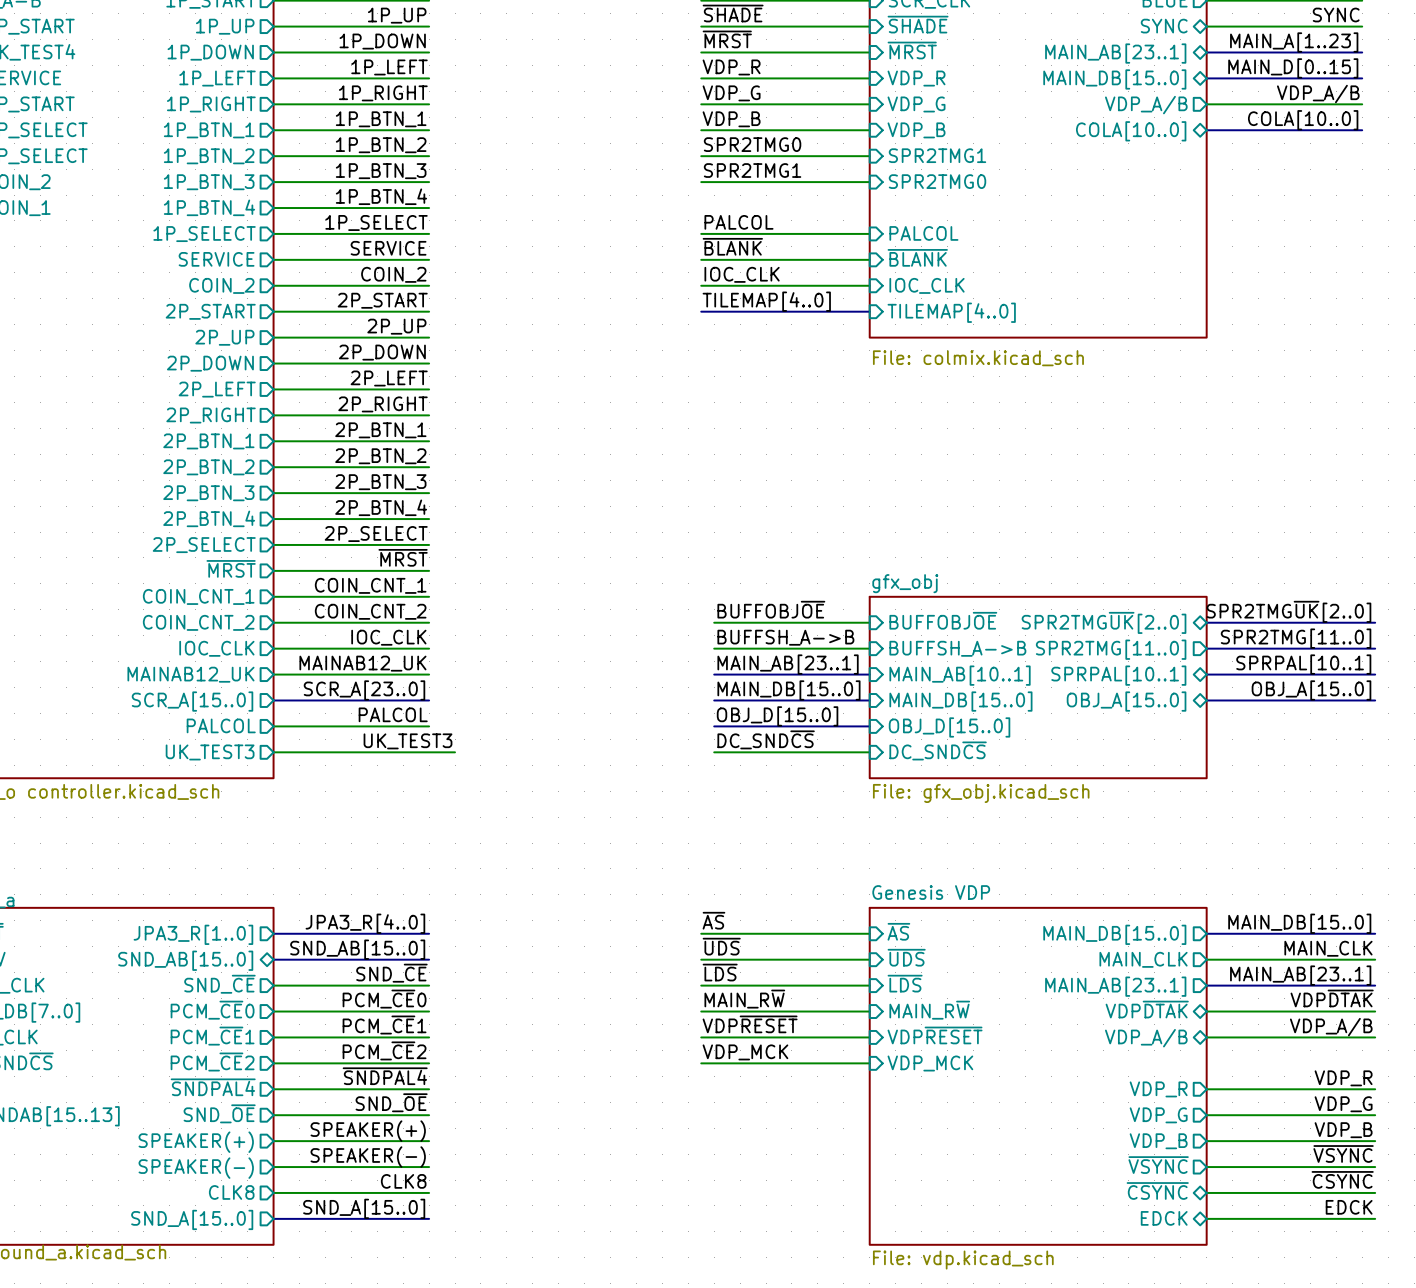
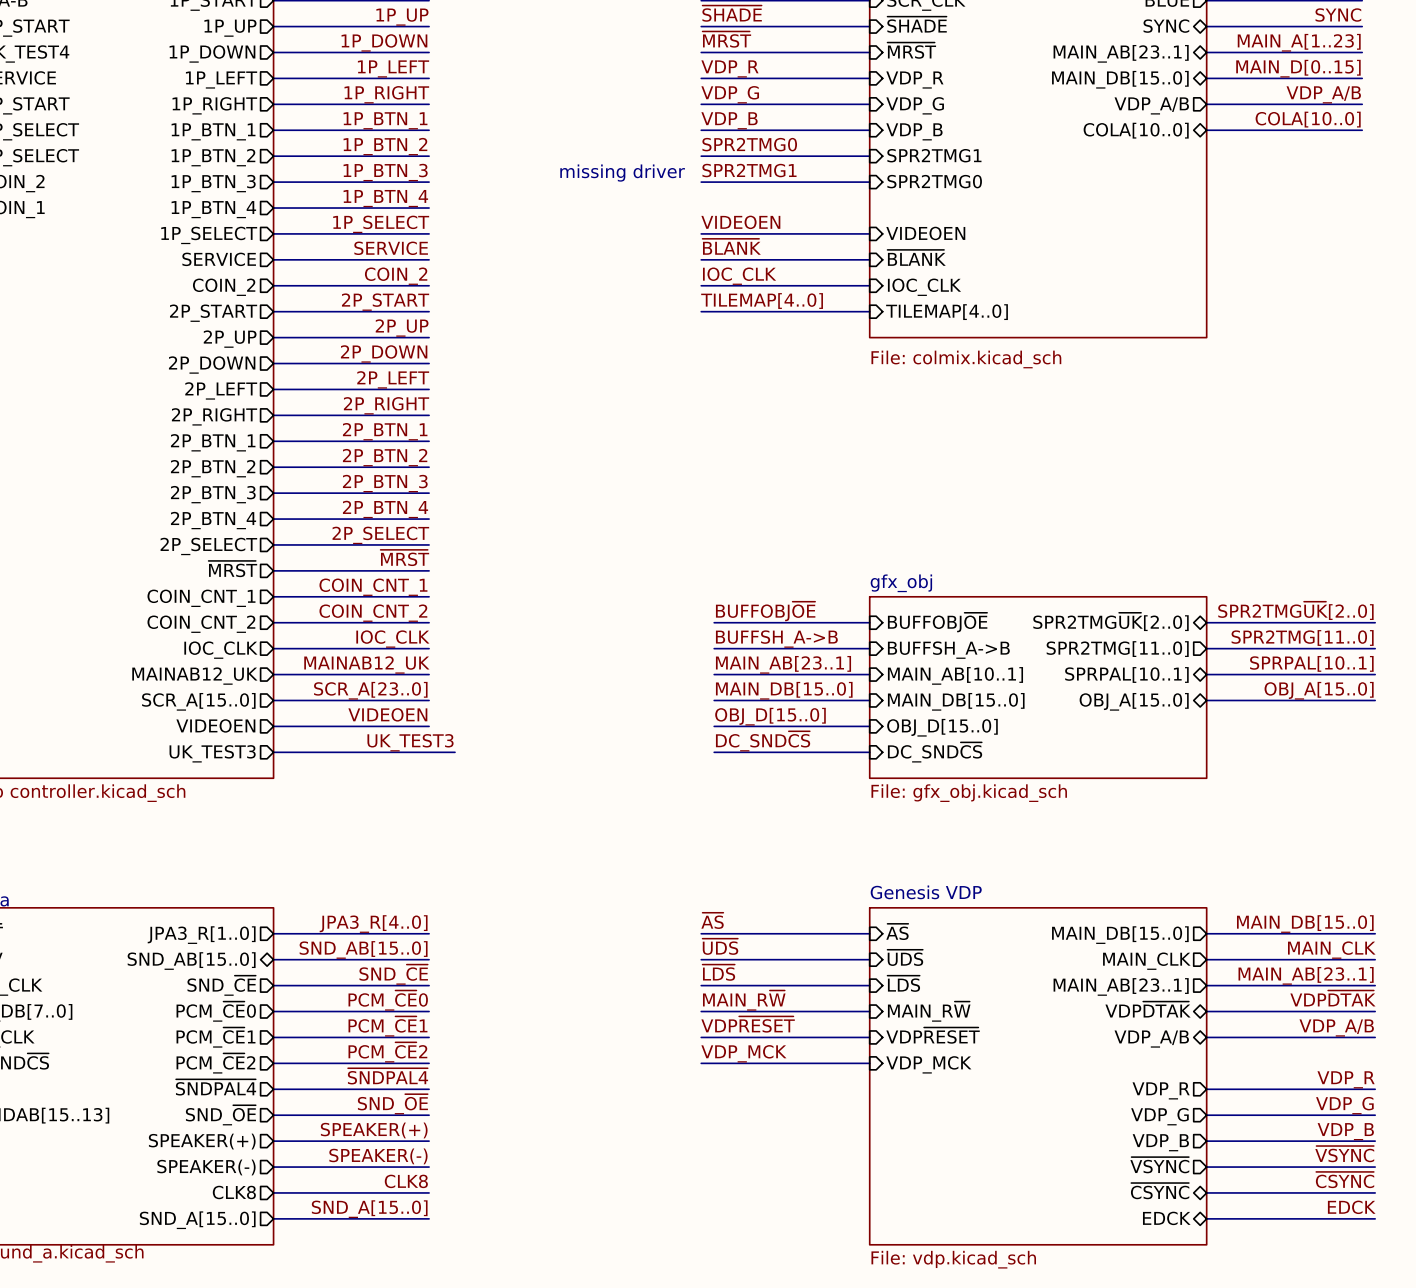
text: none -> missing driver (622, 173)
label: PALCOL (738, 222) -> VIDEOEN (740, 222)
sheet pin: PALCOL (923, 233) -> VIDEOEN (925, 233)
label: PALCOL (393, 714) -> VIDEOEN (387, 714)
sheet pin: PALCOL (221, 725) -> VIDEOEN (215, 725)

